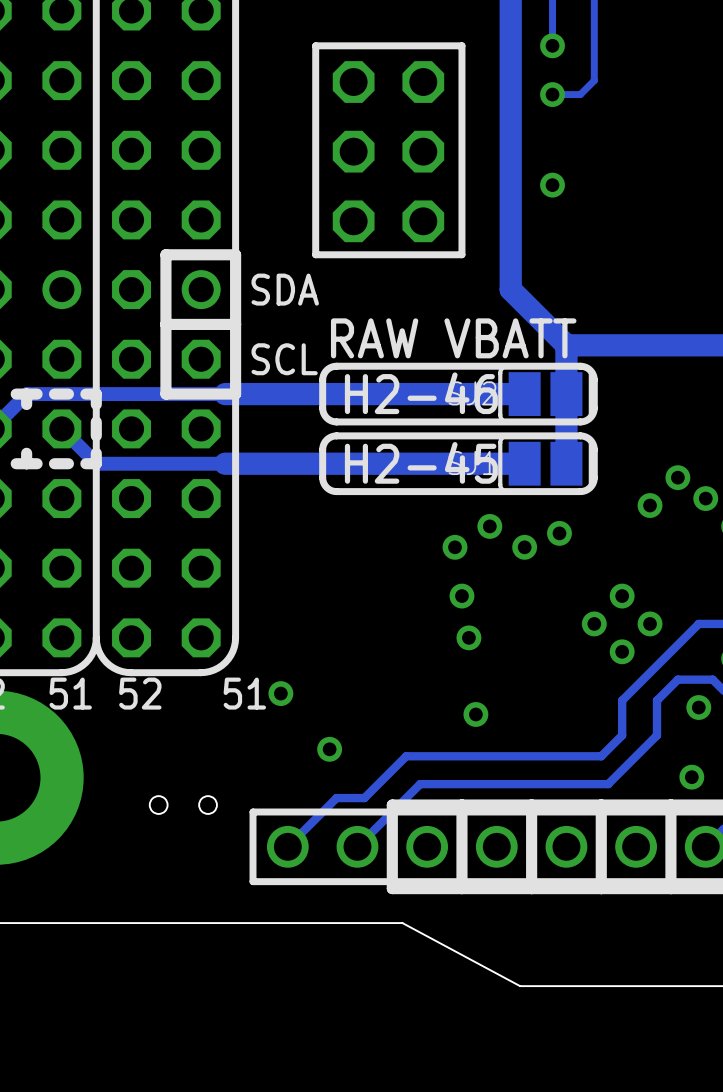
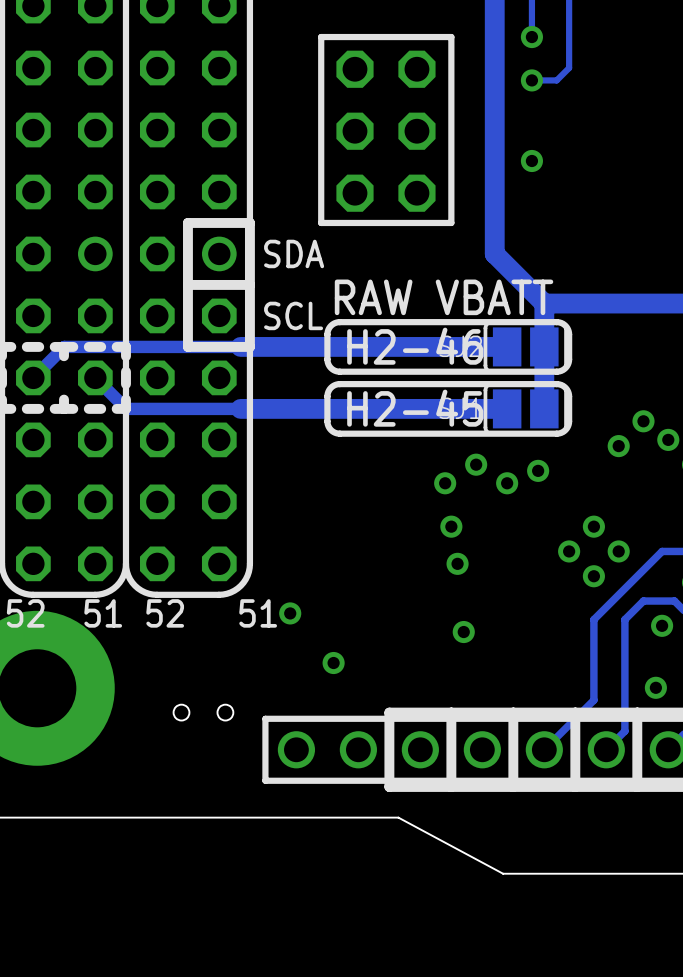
track: (622, 735) (601, 756) (406, 756) (364, 798) (336, 798) (287, 846) -> (593, 650) (593, 700) (544, 749)
track: (657, 735) (608, 784) (420, 784) (357, 846) -> (624, 650) (624, 731) (606, 749)

